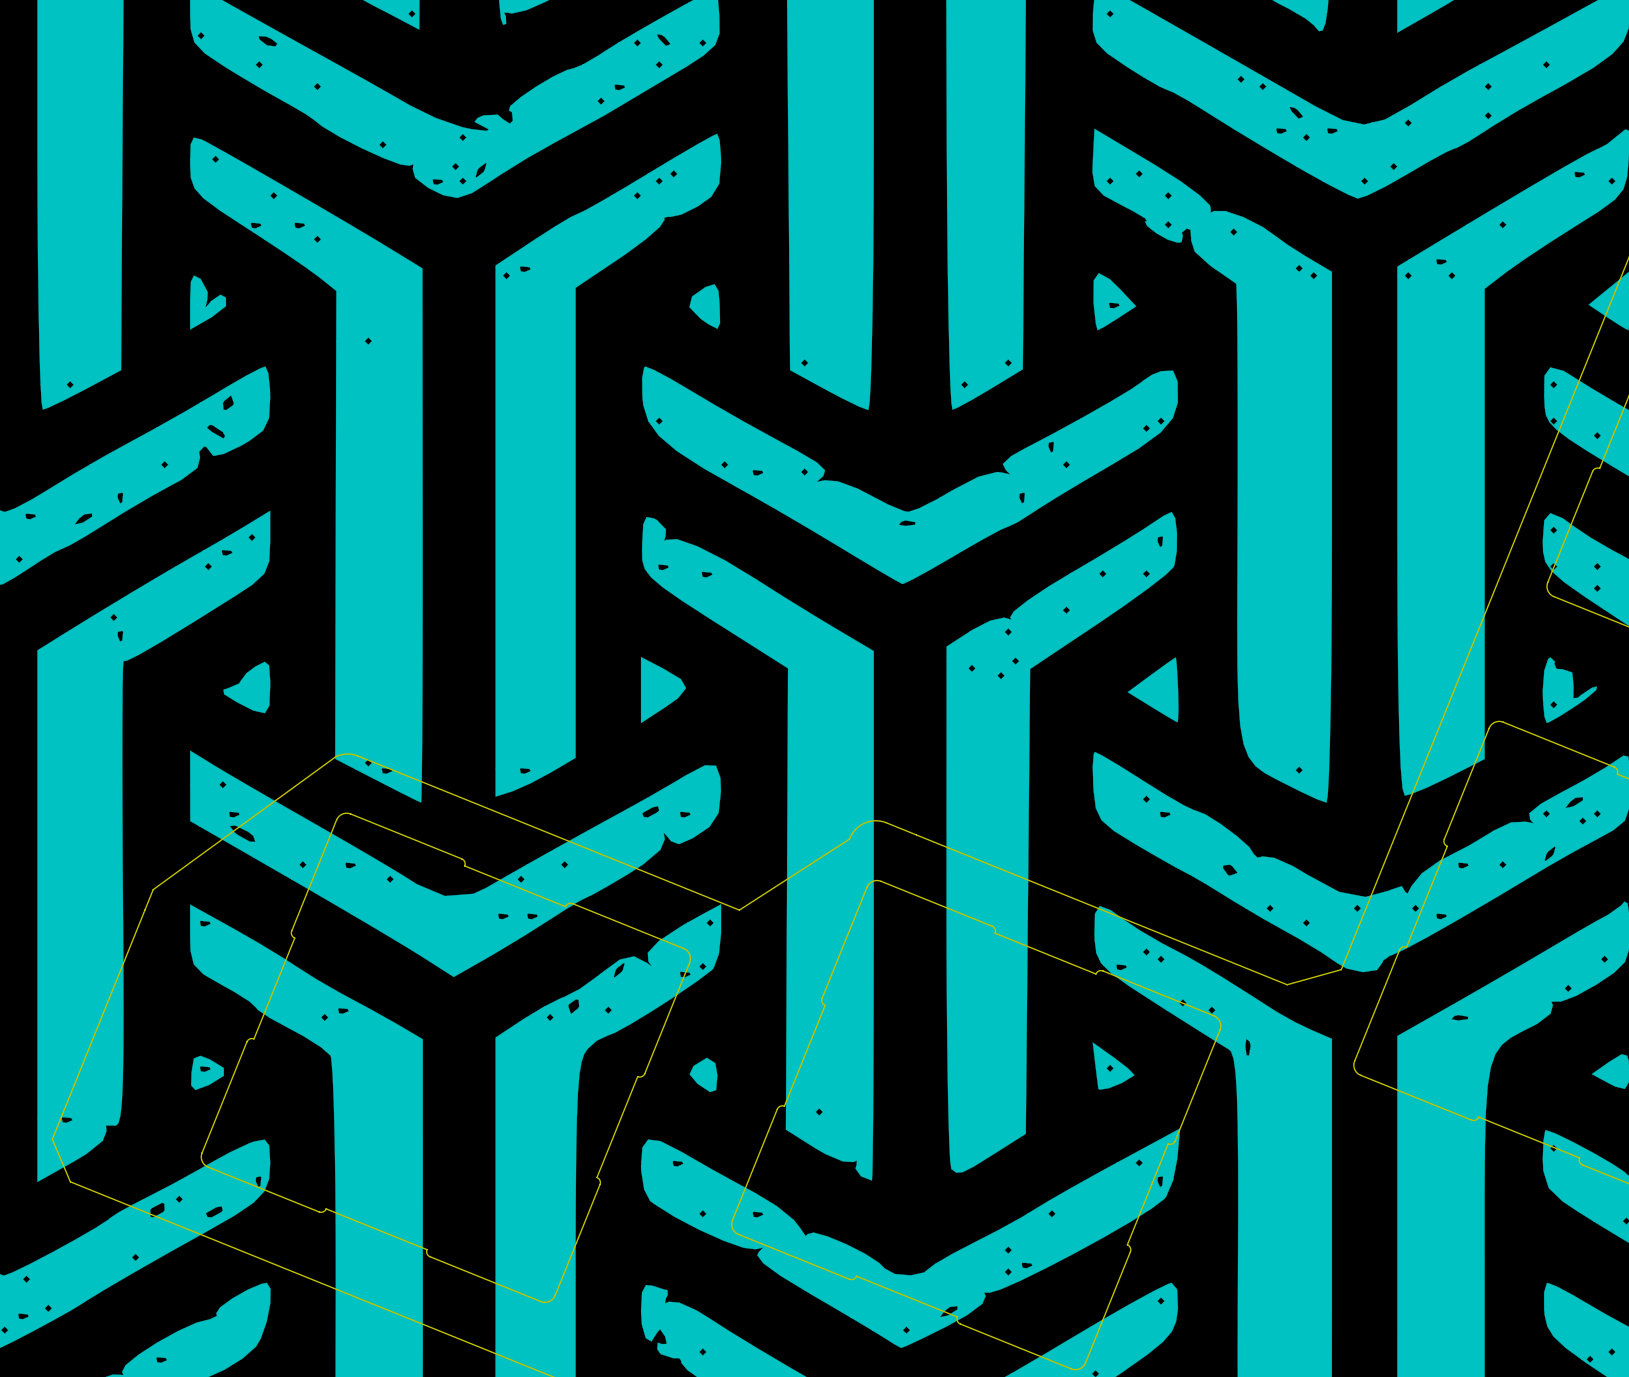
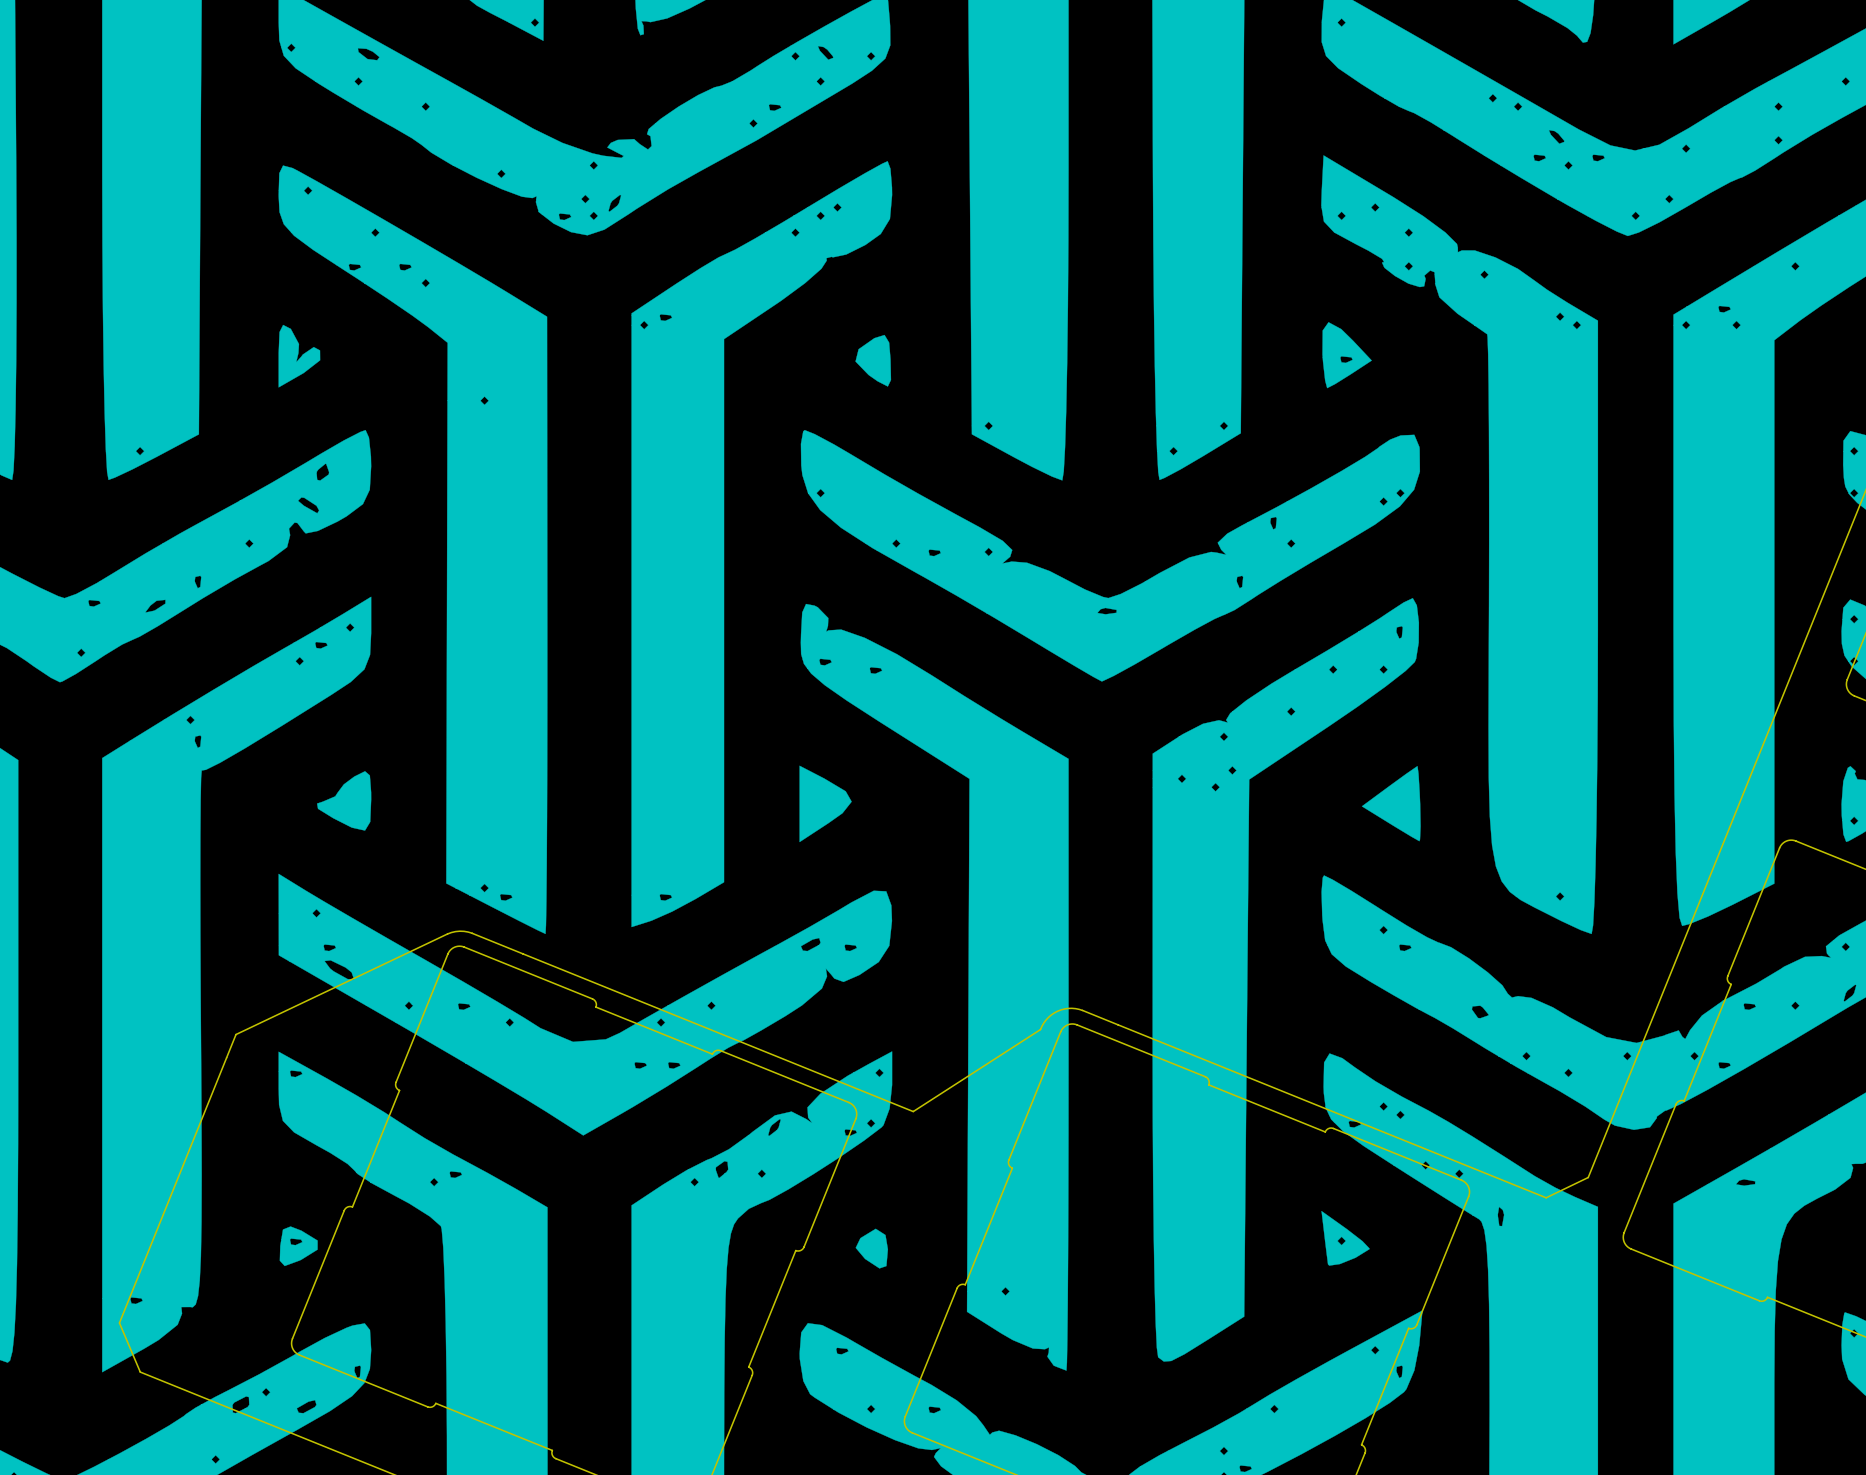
board edge: (357, 755) (346, 754) (336, 756) (153, 889) -> (472, 933) (459, 931) (447, 933) (236, 1034)
board edge: (357, 755) (739, 910) (849, 839) (854, 830) (861, 824) (873, 820) (885, 822) -> (472, 933) (913, 1111) (1040, 1029) (1046, 1020) (1054, 1012) (1068, 1008) (1082, 1010)
board edge: (885, 822) (1287, 984) (1341, 969) -> (1082, 1010) (1546, 1197) (1588, 1177) (1608, 1126)

